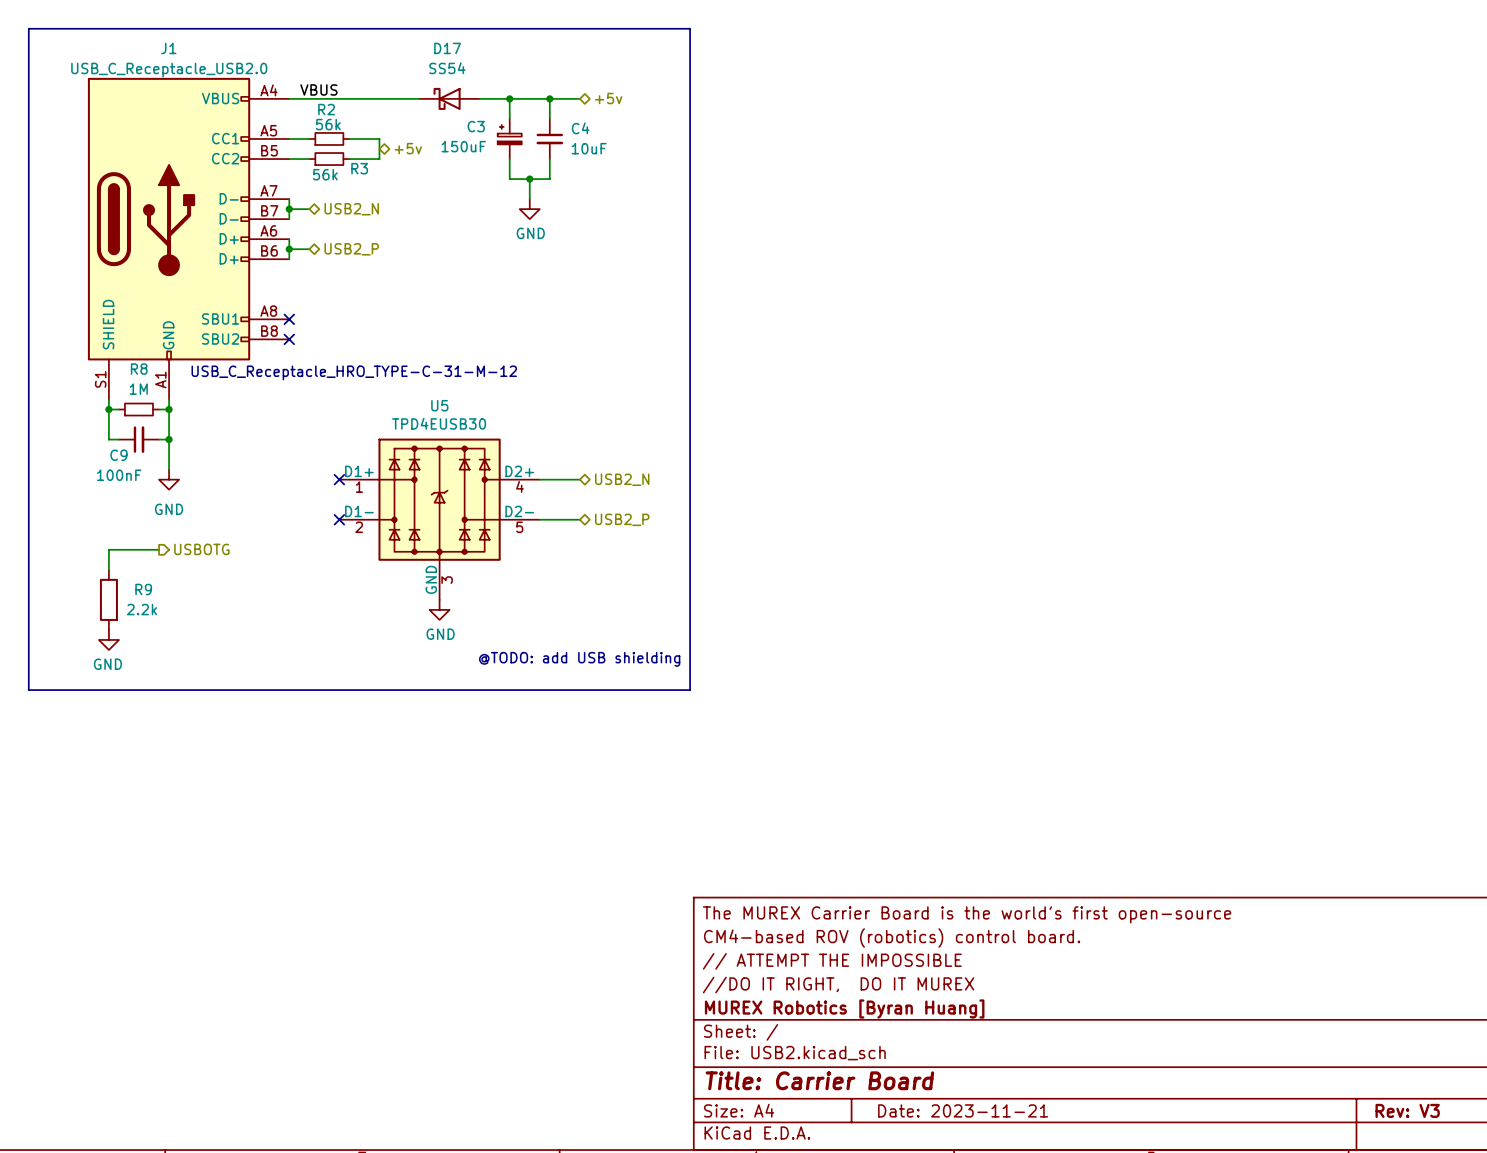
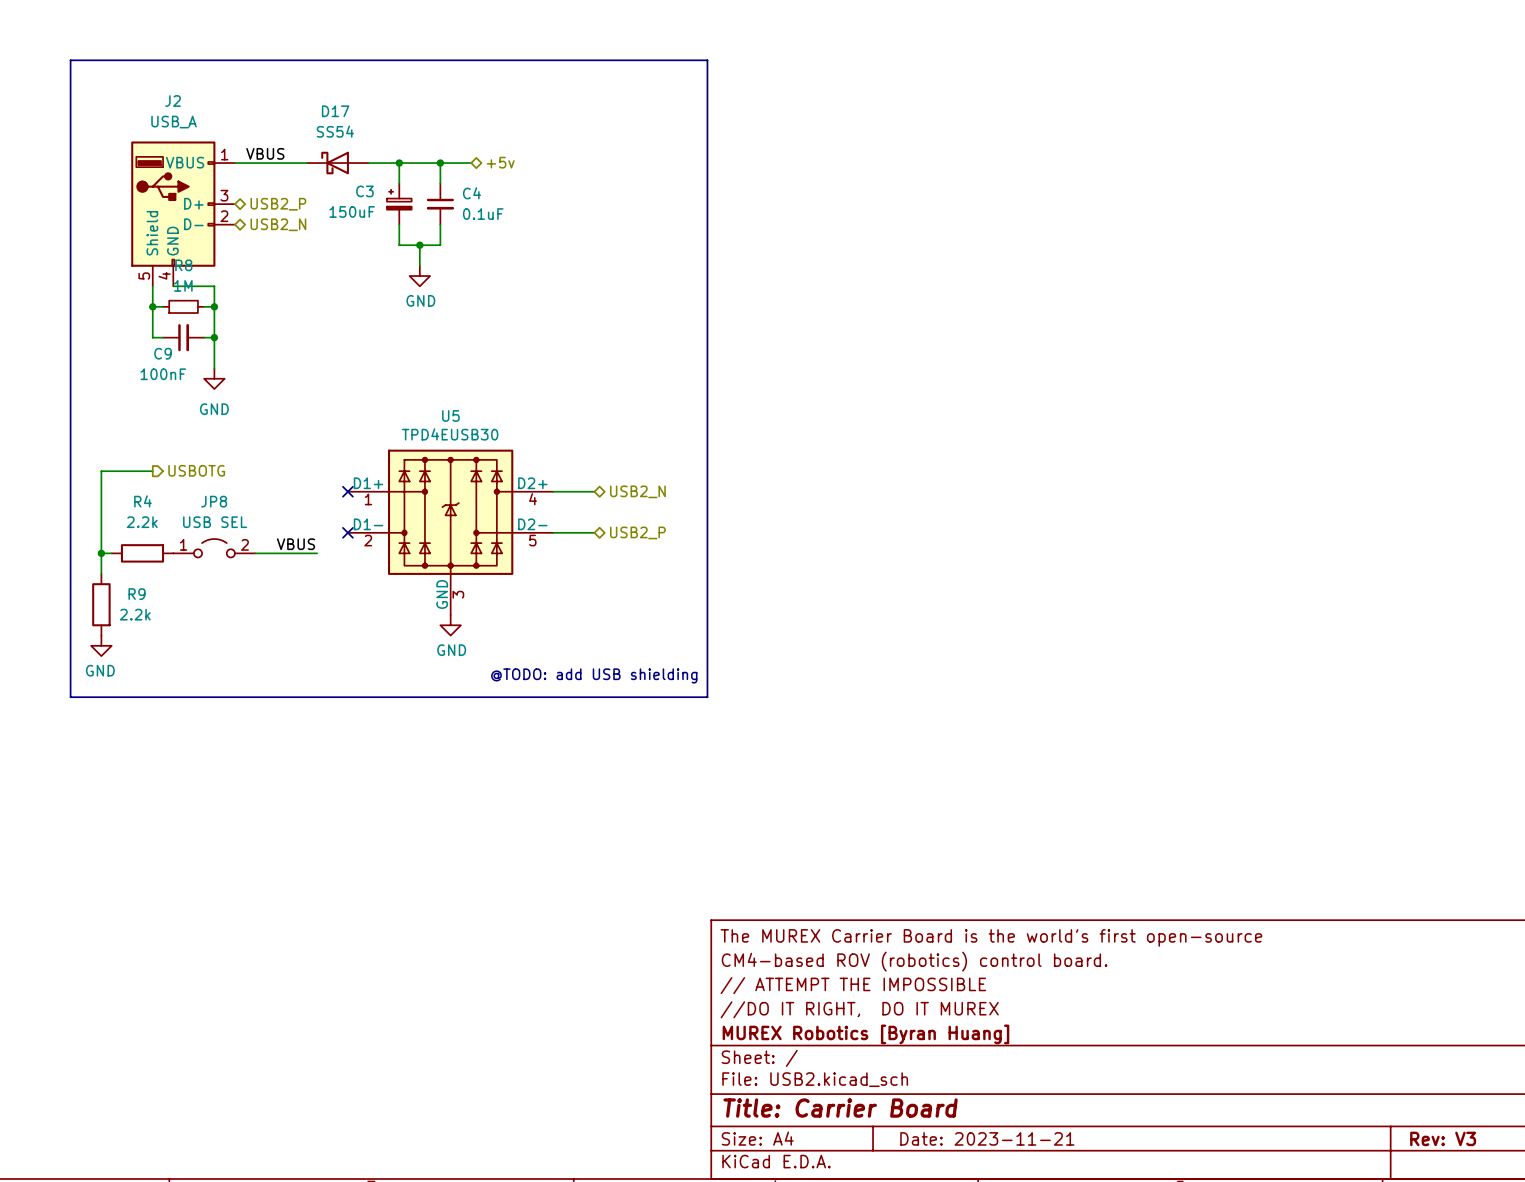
line: (690, 58) (690, 28) (28, 28) (28, 690) (690, 690) (690, 680) -> (707, 60) (70, 60) (70, 697) (707, 697)
label position: VBUS (318, 89) -> VBUS (265, 153)
wire: (289, 98) (419, 98) -> none
D17 position: (449, 98) -> (337, 163)
wire: (479, 98) (579, 98) -> none
wire: (509, 98) (509, 118) -> (399, 163) (399, 183)
junction: (509, 98) -> none
wire: (549, 98) (549, 118) -> (440, 163) (440, 183)
junction: (549, 98) -> none
hierarchical label: +5v (608, 98) -> none
wire: (289, 138) (309, 138) -> none
R2: 56k (329, 138) -> none
wire: (349, 138) (379, 138) (379, 159) -> (471, 163) (389, 163)
C3 position: (509, 138) -> (399, 204)
C4 position: (549, 138) -> (440, 204)
hierarchical label: +5v (408, 148) -> none
C4 value: 10uF (589, 148) -> 0.1uF (483, 214)
hierarchical label: none -> +5v (500, 162)
R3: 56k (329, 159) -> none
junction: none -> (399, 163)
junction: none -> (440, 163)
wire: (509, 159) (509, 179) (549, 179) (549, 159) -> (399, 224) (399, 245) (440, 245) (440, 224)
wire: (529, 179) (529, 199) -> (419, 245) (419, 265)
junction: (529, 179) -> none
wire: (289, 199) (289, 219) -> none
J2: none -> USB_A (183, 213)
wire: (289, 209) (309, 209) -> none
junction: (289, 209) -> none
hierarchical label position: USB2_N (351, 209) -> USB2_N (278, 224)
power symbol position: GND (529, 209) -> GND (419, 276)
J1: USB_C_Receptacle_USB2.0 (188, 238) -> none
wire: (289, 239) (289, 259) -> none
junction: none -> (419, 245)
wire: (289, 249) (309, 249) -> none
junction: (289, 249) -> none
hierarchical label position: USB2_P (351, 249) -> USB2_P (278, 204)
junction: none -> (152, 306)
junction: none -> (214, 306)
no-connect mark: (289, 319) -> none
junction: none -> (214, 337)
no-connect mark: (289, 339) -> none
power symbol: none -> GND (214, 378)
text: USB_C_Receptacle_HRO_TYPE-C-31-M-12 (354, 372) -> none
wire: (108, 399) (108, 439) (118, 439) -> none
wire: (169, 399) (169, 469) -> none
junction: (108, 409) -> none
R8 position: (138, 409) -> (183, 306)
junction: (169, 409) -> none
C9 position: (138, 439) -> (183, 337)
junction: (169, 439) -> none
wire: none -> (152, 471) (101, 471) (101, 573)
power symbol: GND (169, 479) -> none
label: none -> VBUS (296, 544)
JP8: none -> USB SEL (214, 548)
wire: none -> (101, 553) (111, 553)
junction: none -> (101, 553)
R4: none -> 2.2k (142, 553)
wire: none -> (255, 553) (317, 553)
wire: (159, 549) (108, 549) (108, 569) -> none
hierarchical label position: USBOTG (201, 549) -> USBOTG (196, 470)
R9 position: (108, 599) -> (101, 604)
power symbol position: GND (108, 639) -> GND (101, 645)

